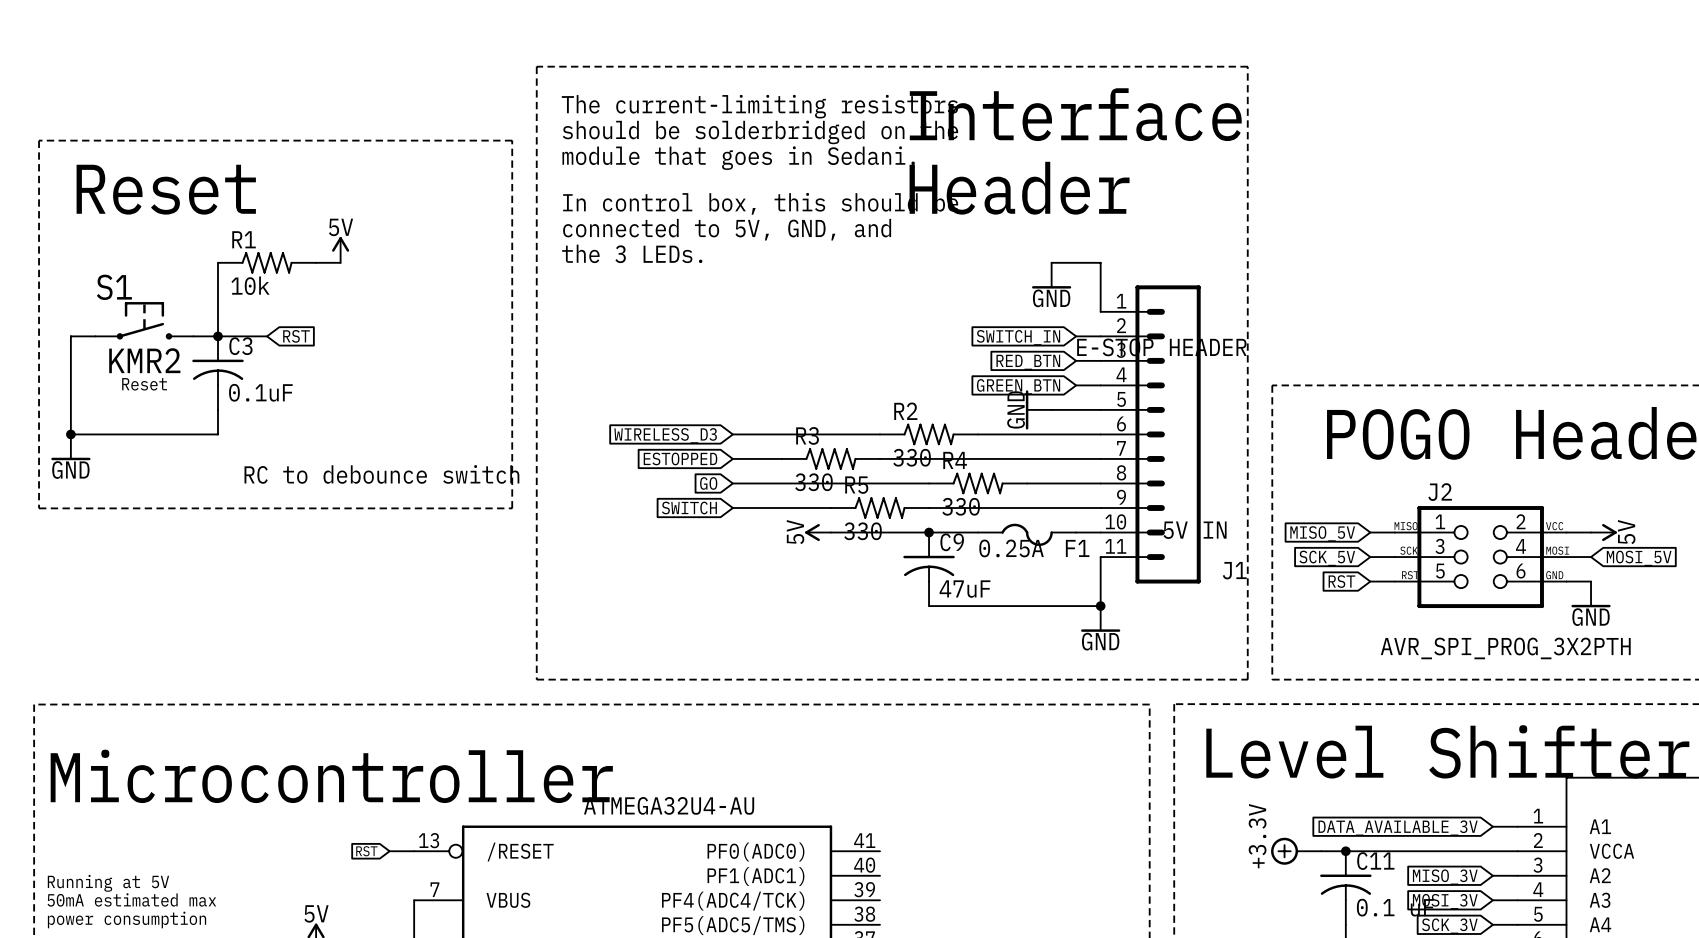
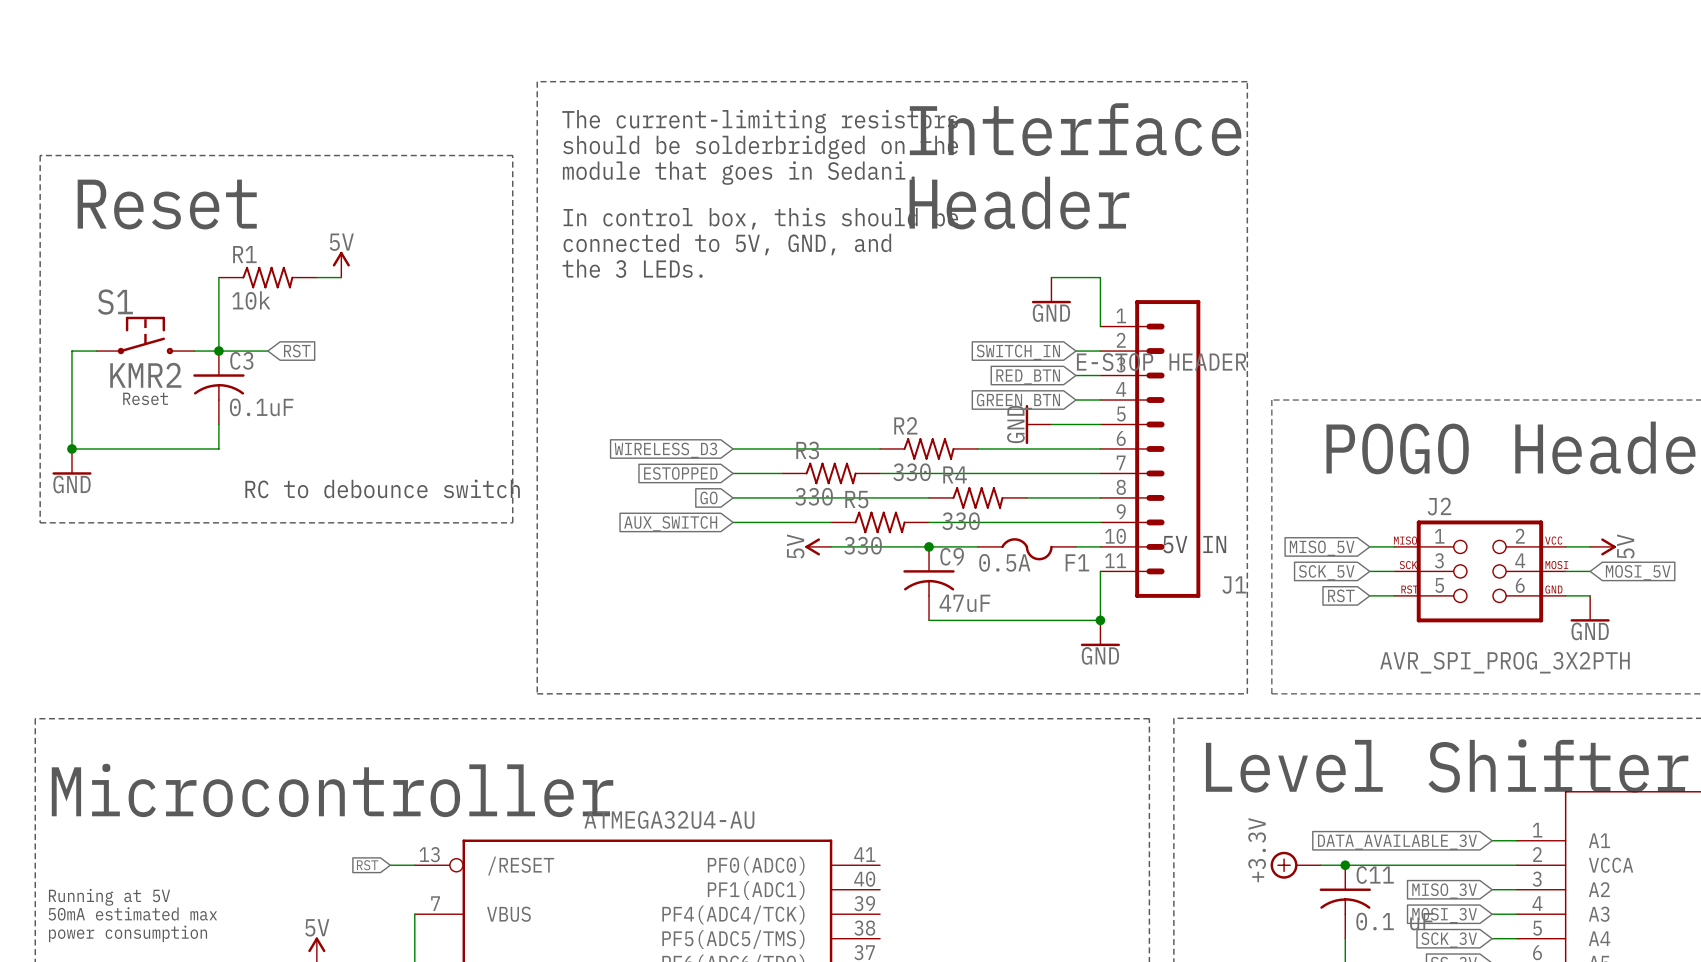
global label: SWITCH (689, 508) -> AUX_SWITCH (670, 523)
F1 value: 0.25A (1011, 548) -> 0.5A (1004, 562)

